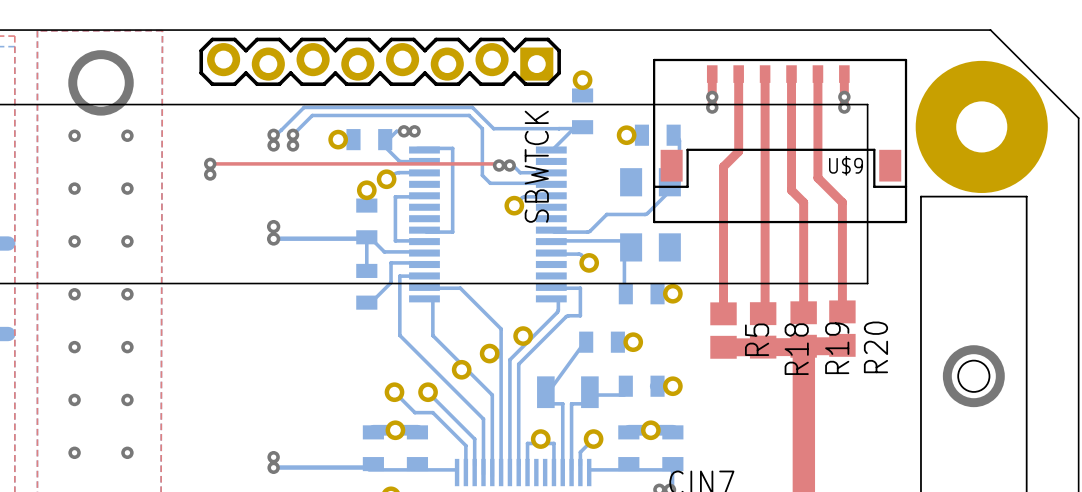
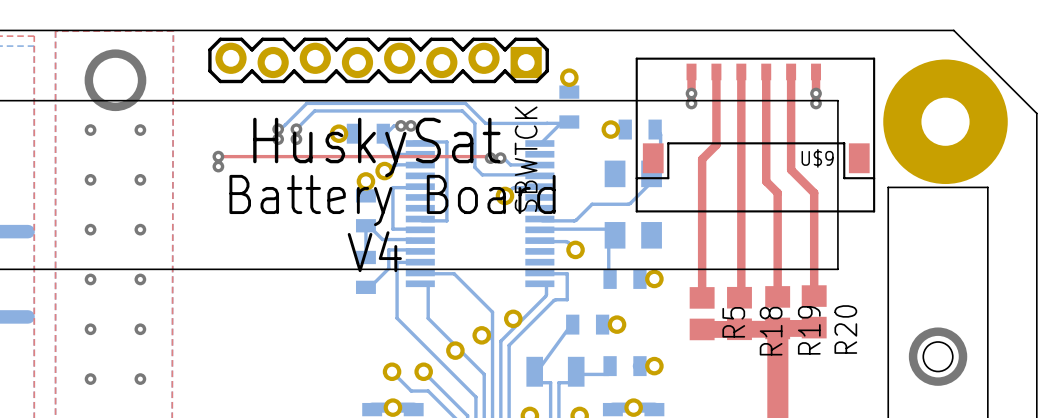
text: none -> HuskySat (376, 147)
text: none -> Battery Board (392, 200)
via: (273, 226) -> none
bottom track: (273, 238) (366, 238) -> none
via: (273, 238) -> none
text: none -> V4 (374, 251)

